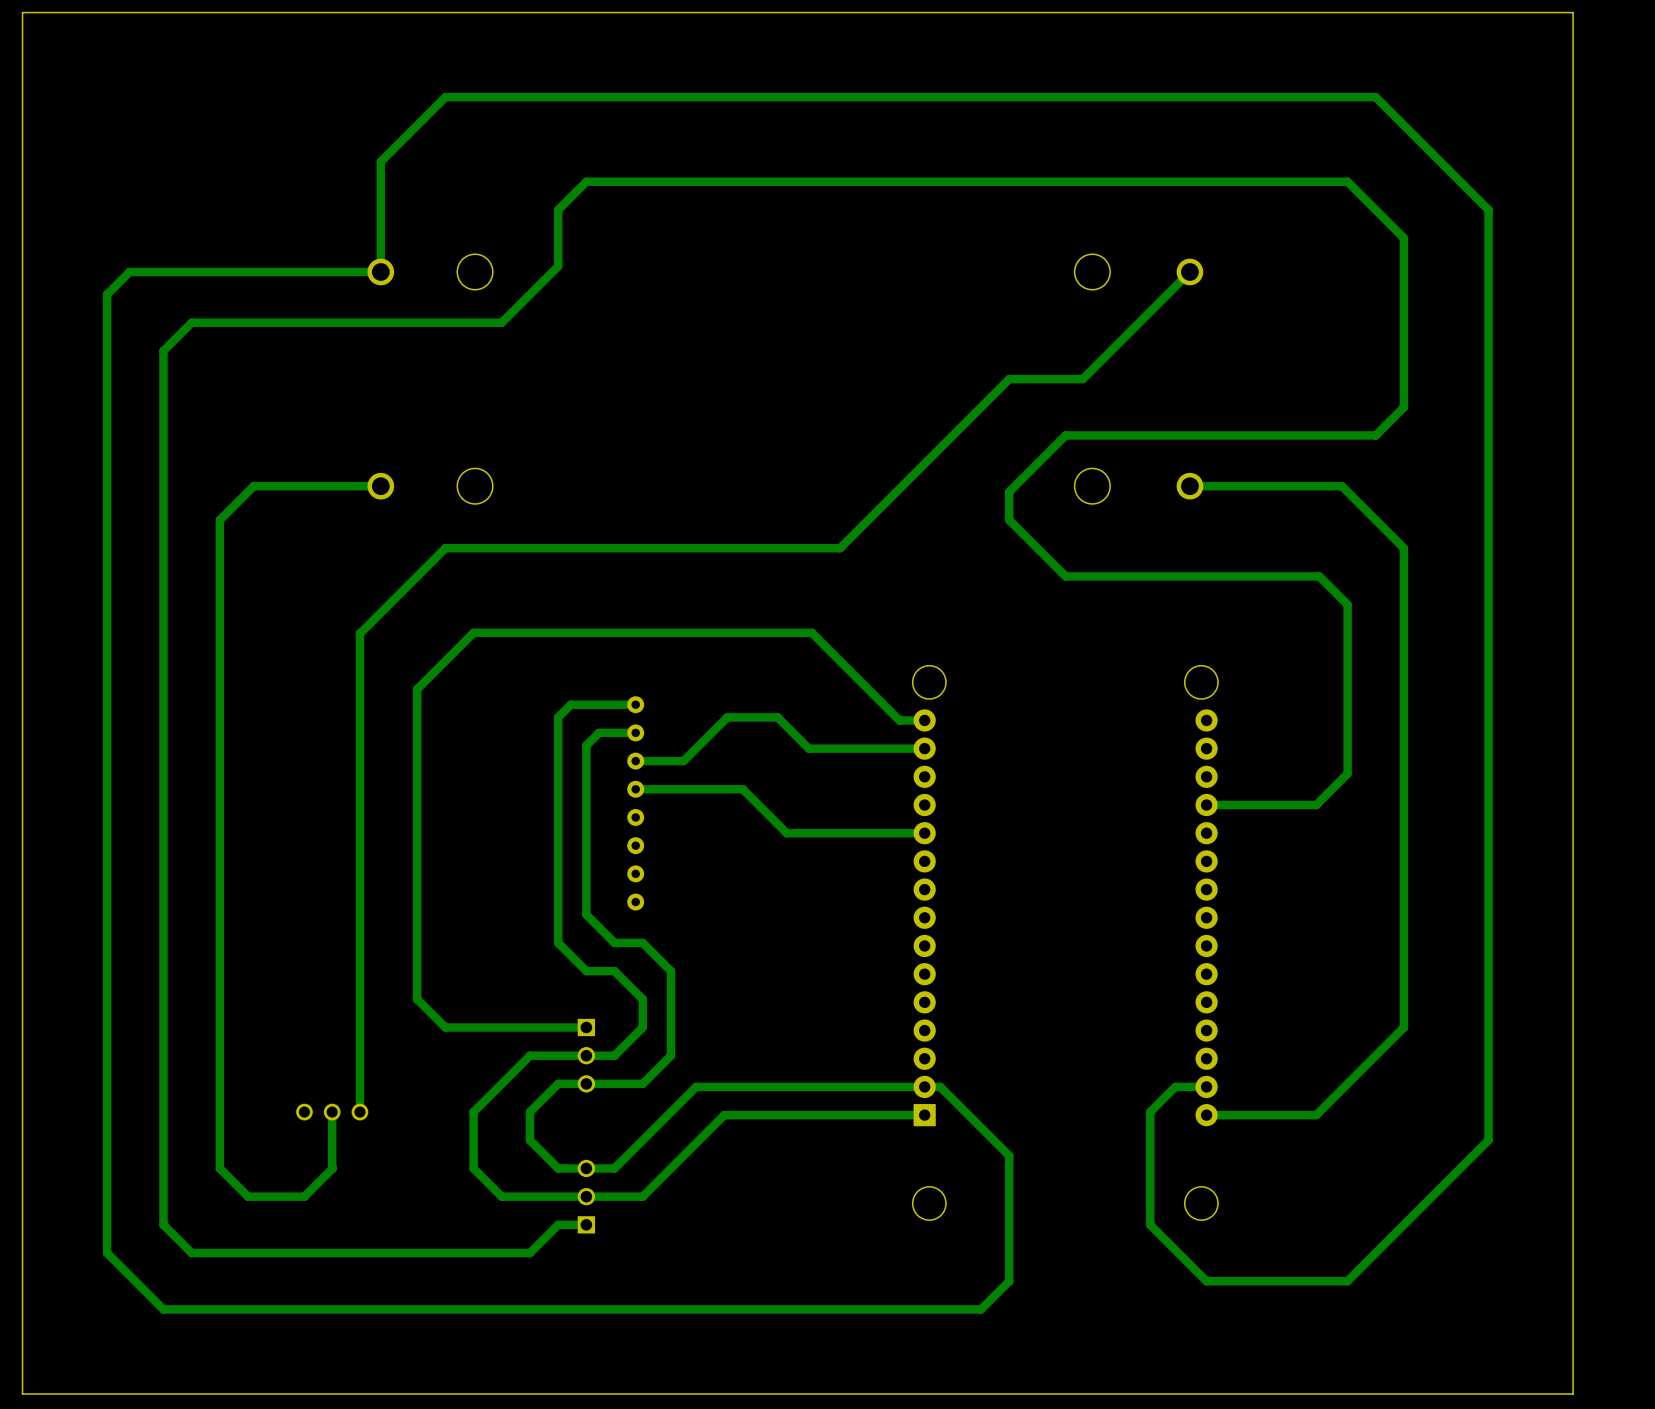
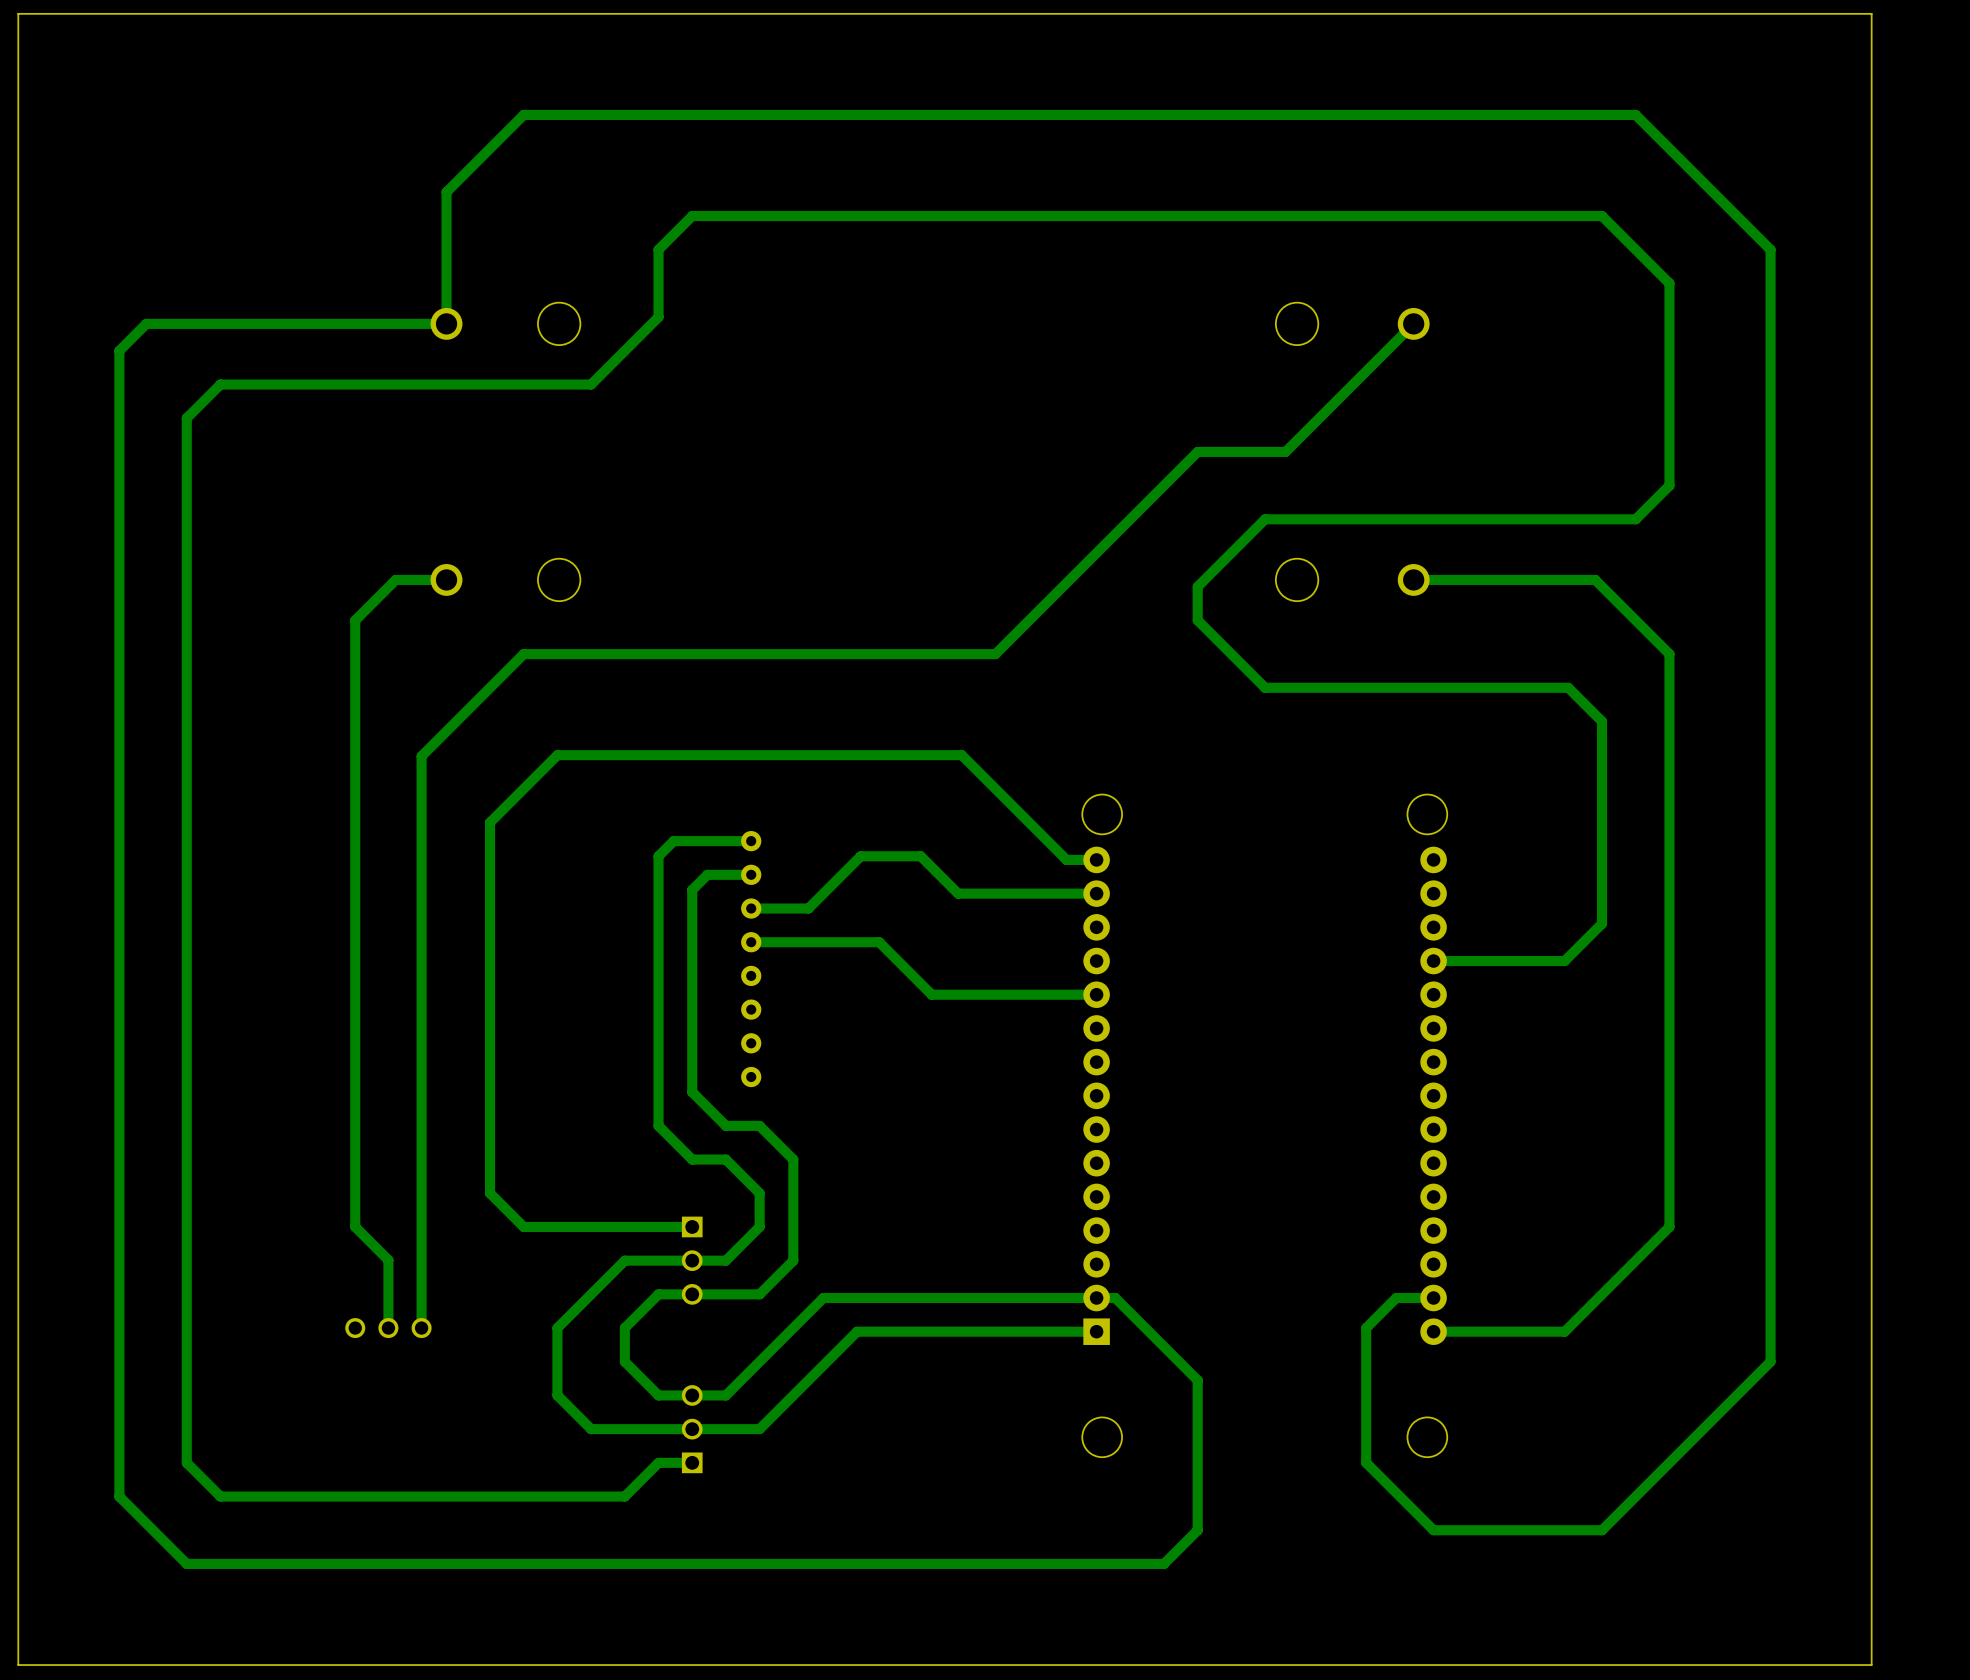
track: (338, 486) (253, 486) (219, 520) (219, 1168) (248, 1196) (304, 1196) (332, 1168) (332, 1112) -> (395, 579) (355, 620) (355, 1226) (388, 1260) (388, 1328)

